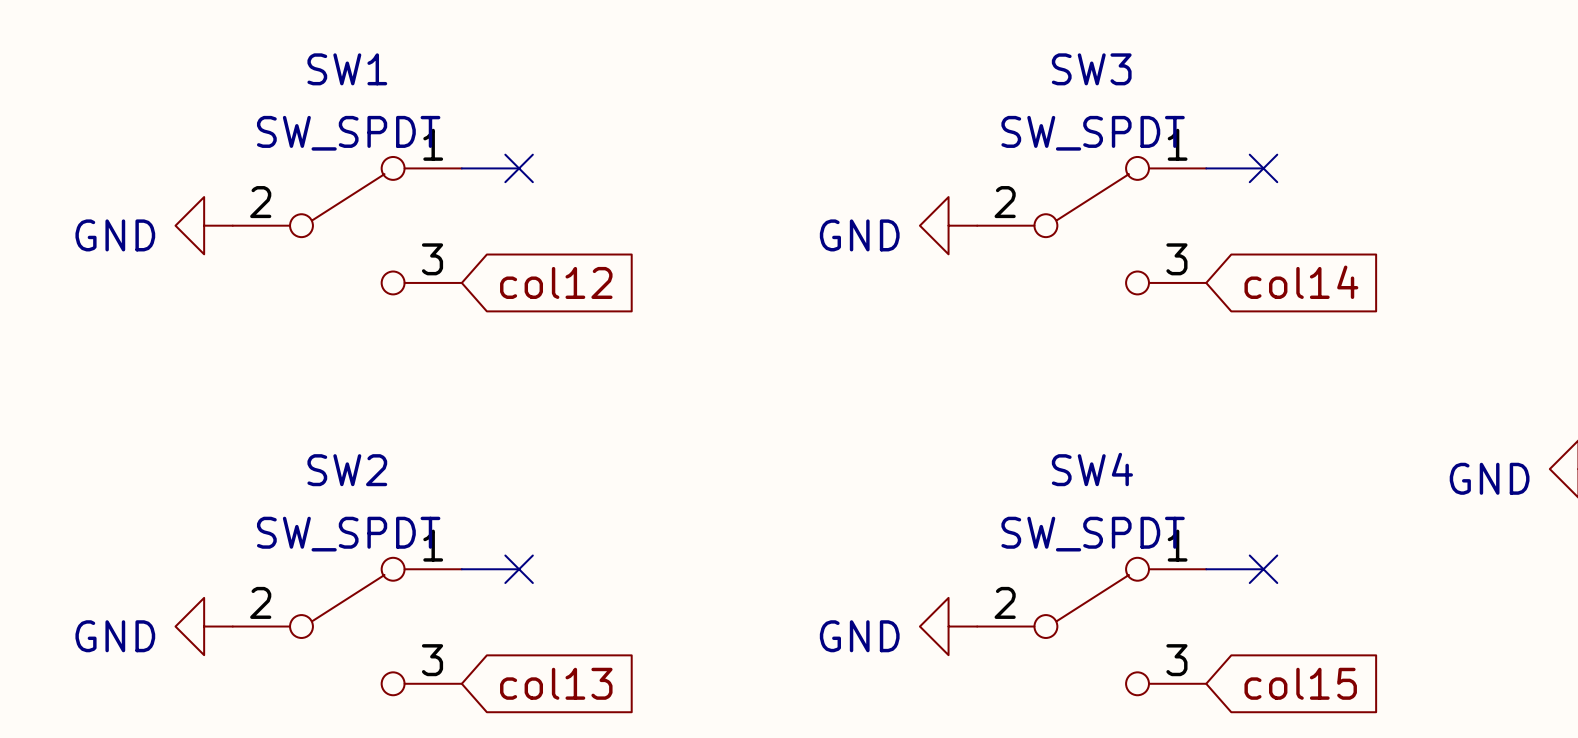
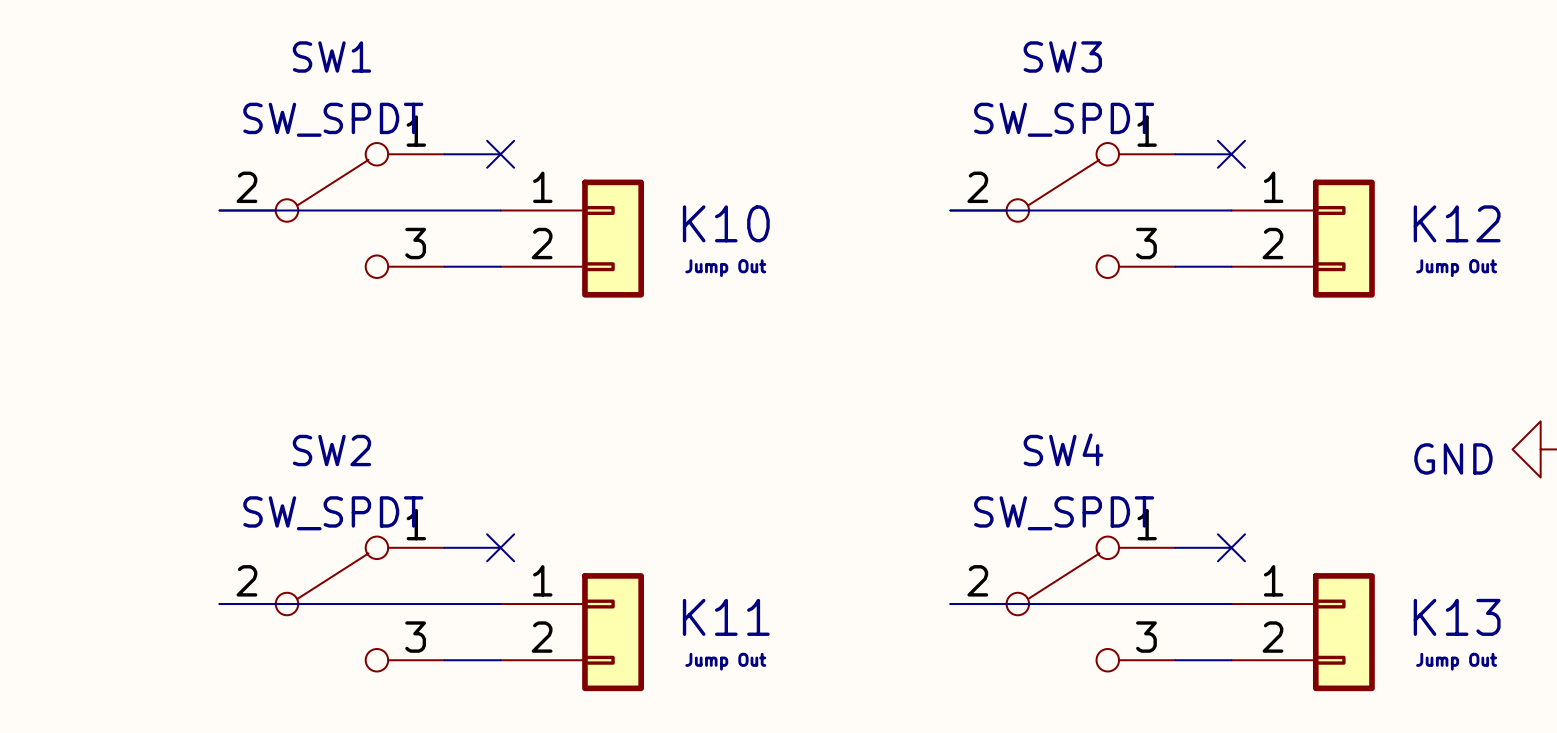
power symbol: GND (204, 225) -> none
wire: none -> (219, 210) (500, 210)
power symbol: GND (948, 225) -> none
wire: none -> (950, 210) (1231, 210)
K10: none -> Jump Out (572, 238)
K12: none -> Jump Out (1303, 238)
wire: none -> (444, 266) (500, 266)
global label: col12 (556, 282) -> none
wire: none -> (1175, 266) (1231, 266)
global label: col14 (1301, 282) -> none
power symbol: GND (204, 626) -> none
wire: none -> (219, 604) (500, 604)
power symbol: GND (948, 626) -> none
wire: none -> (950, 604) (1231, 604)
K11: none -> Jump Out (572, 632)
K13: none -> Jump Out (1303, 632)
wire: none -> (444, 660) (500, 660)
global label: col13 (556, 683) -> none
wire: none -> (1175, 660) (1231, 660)
global label: col15 (1300, 683) -> none

